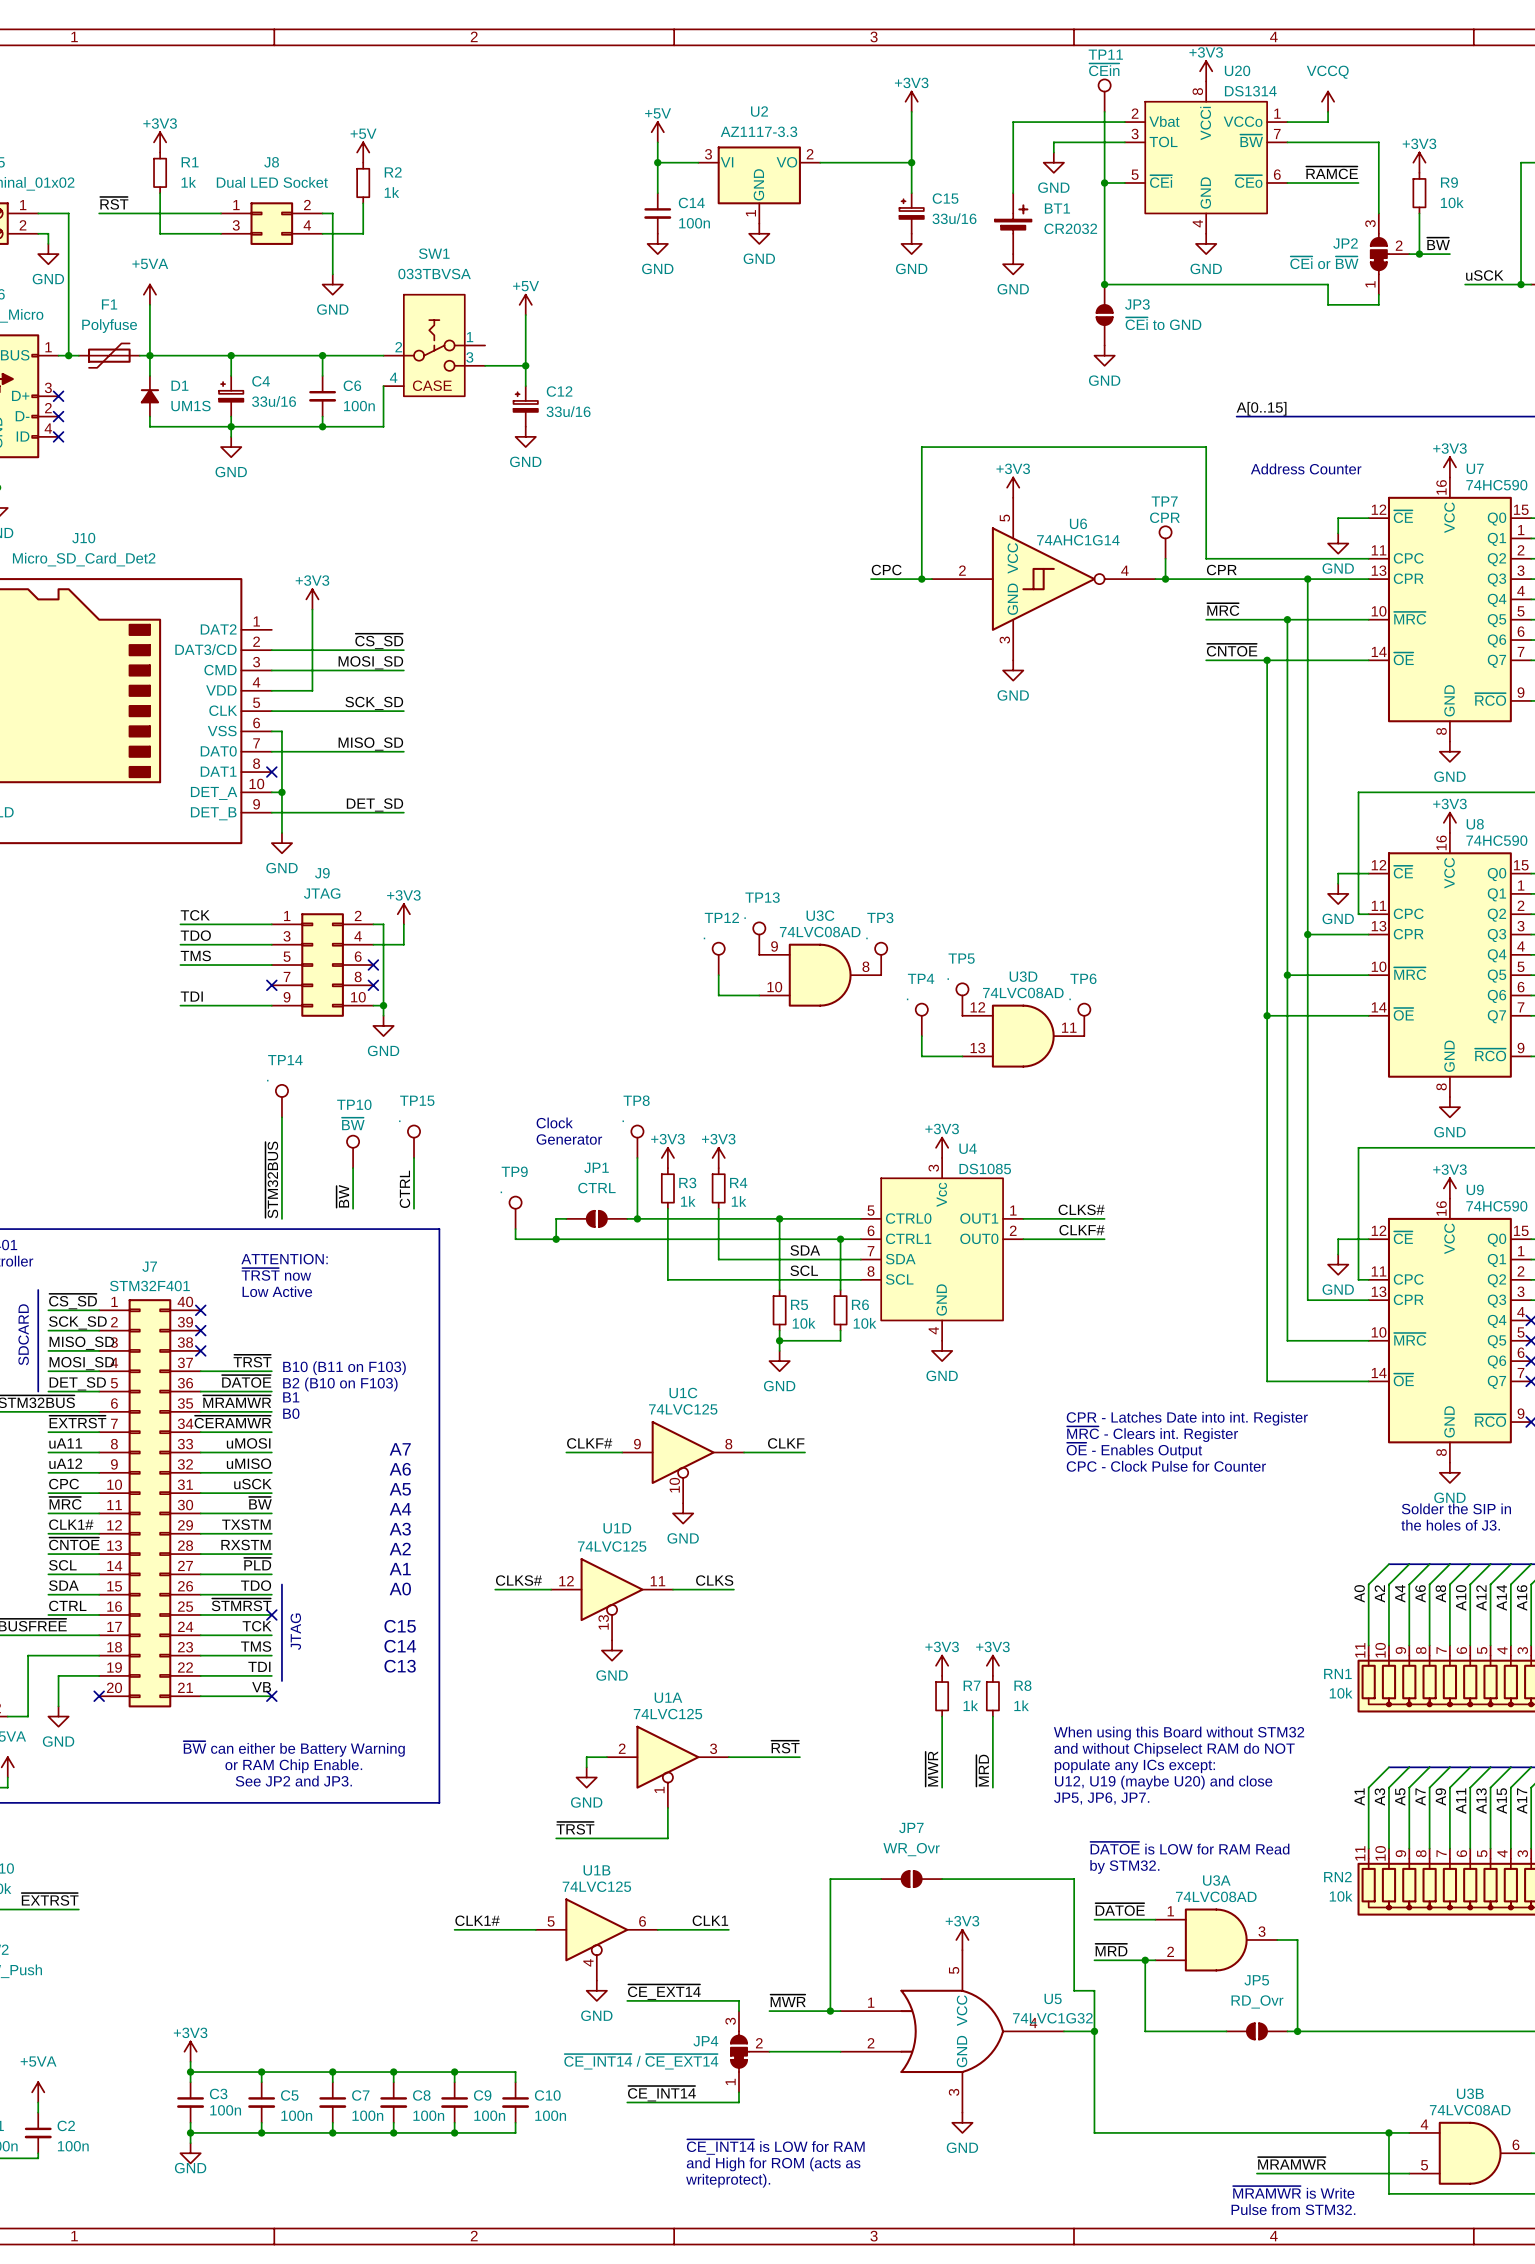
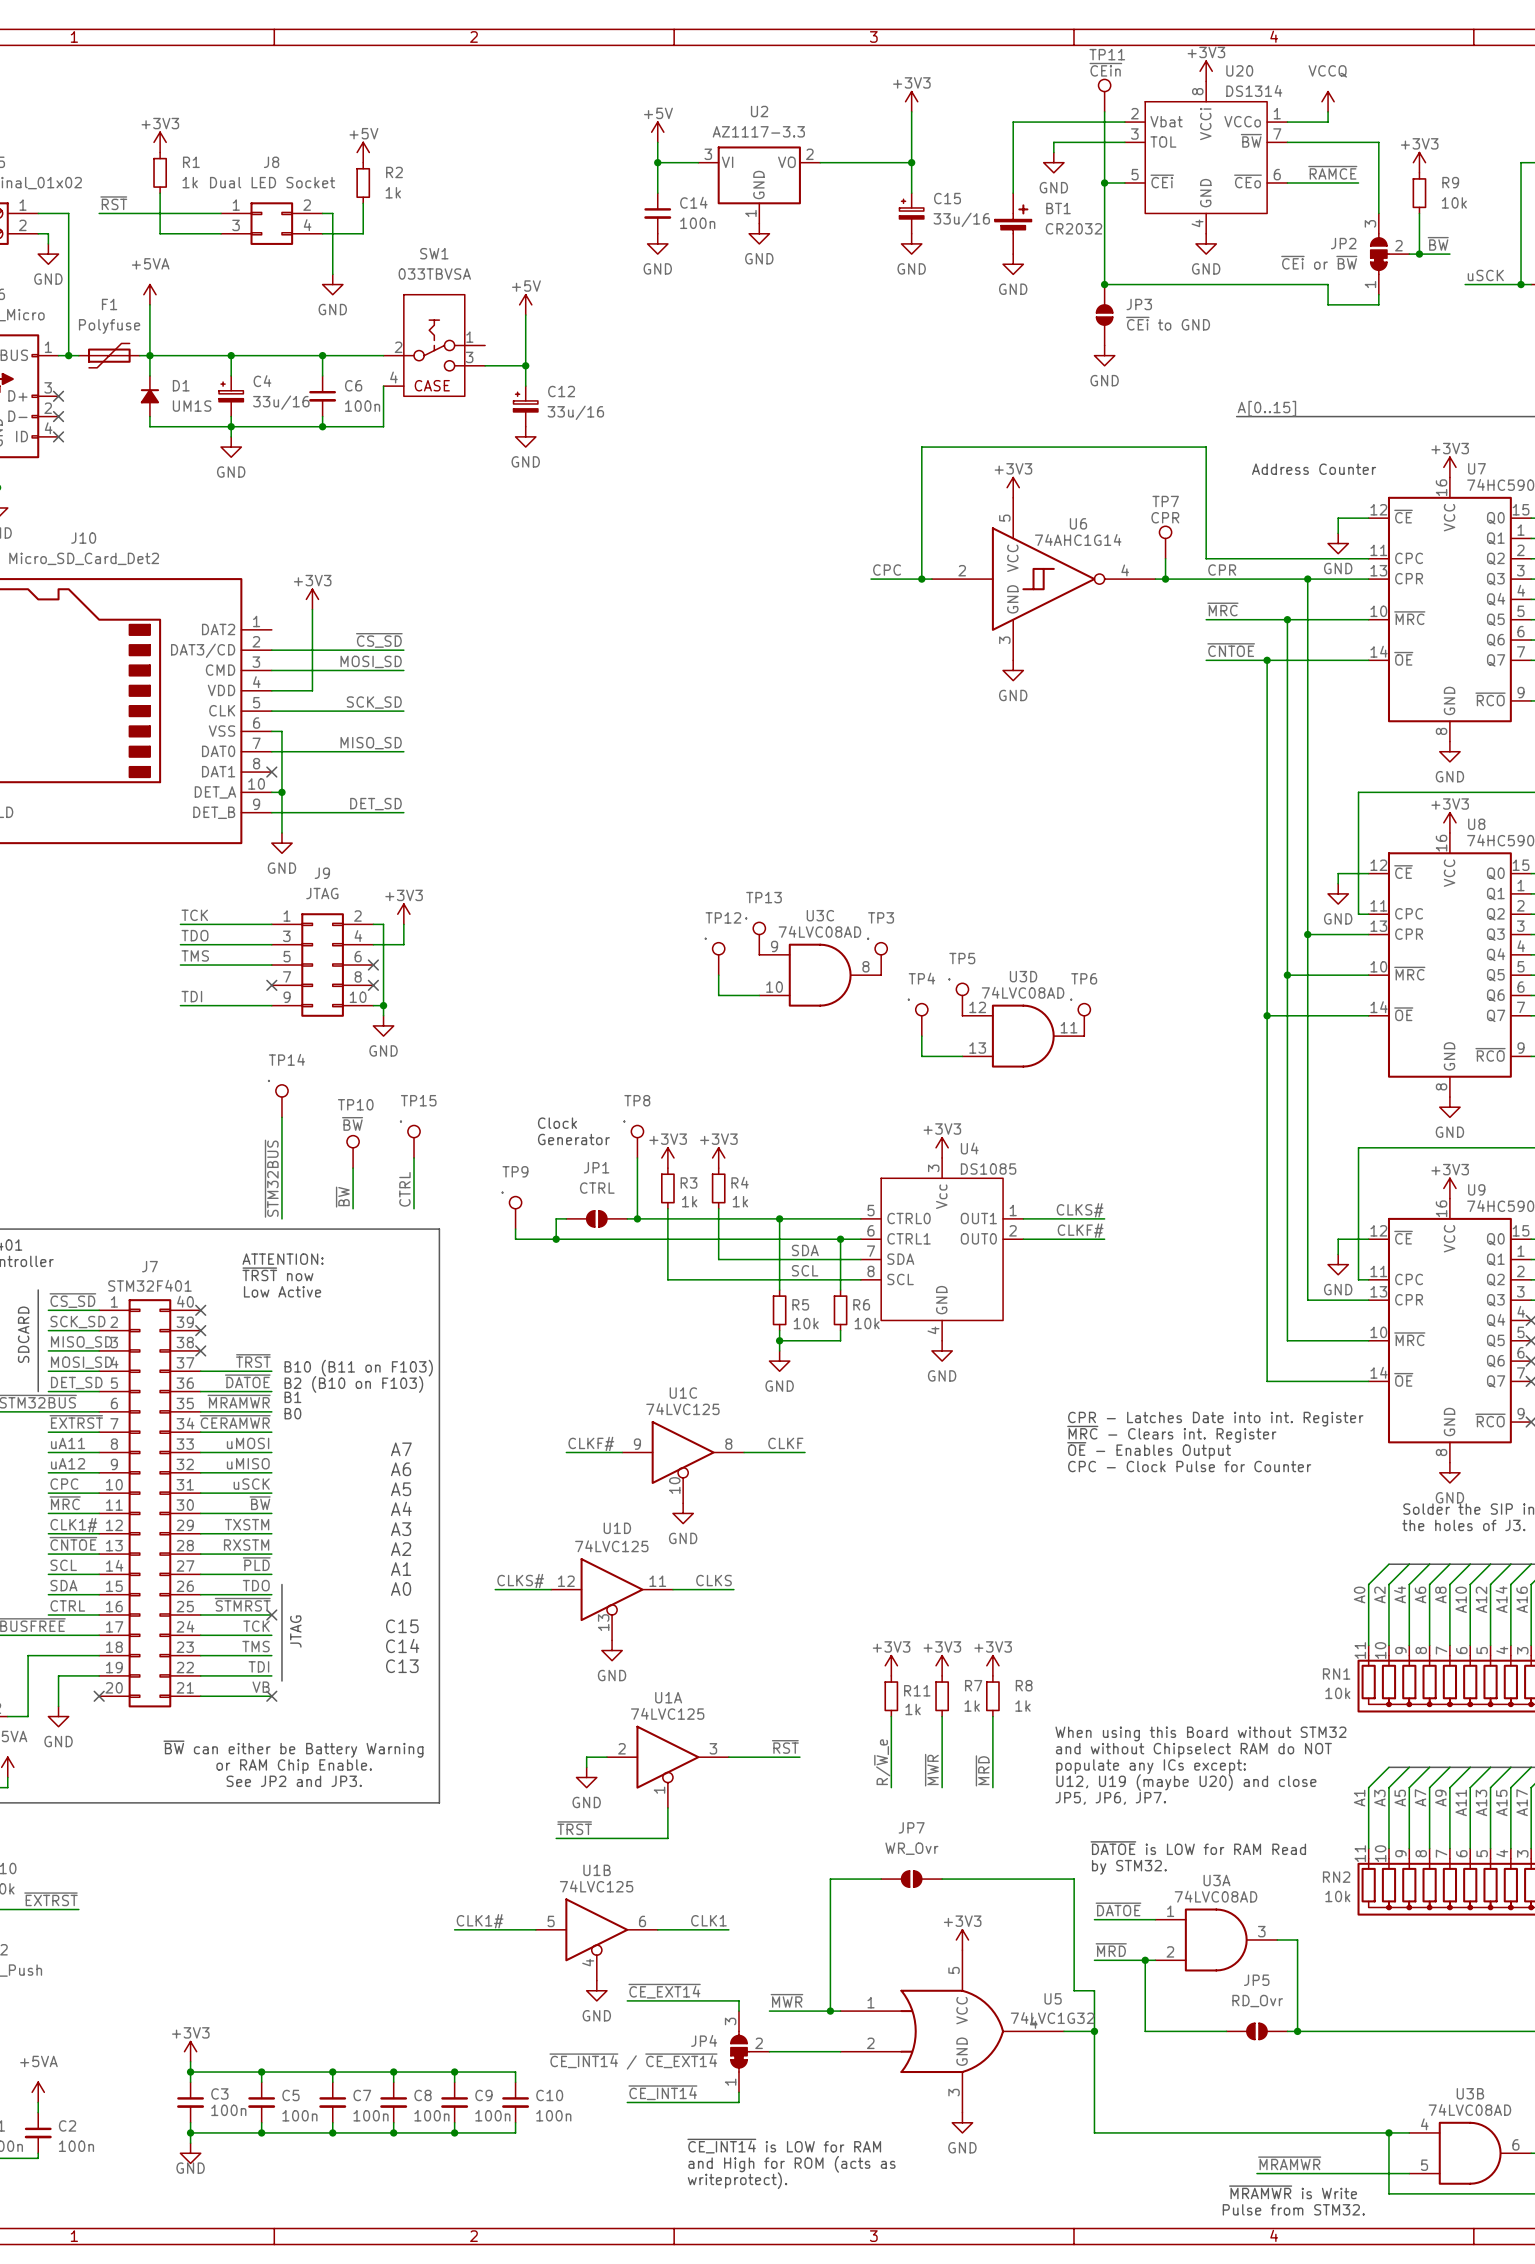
power symbol: none -> +3V3 (891, 1665)
R11: none -> 1k (891, 1696)
wire: none -> (891, 1716) (891, 1787)
label: none -> R/~{W}_e (882, 1762)

